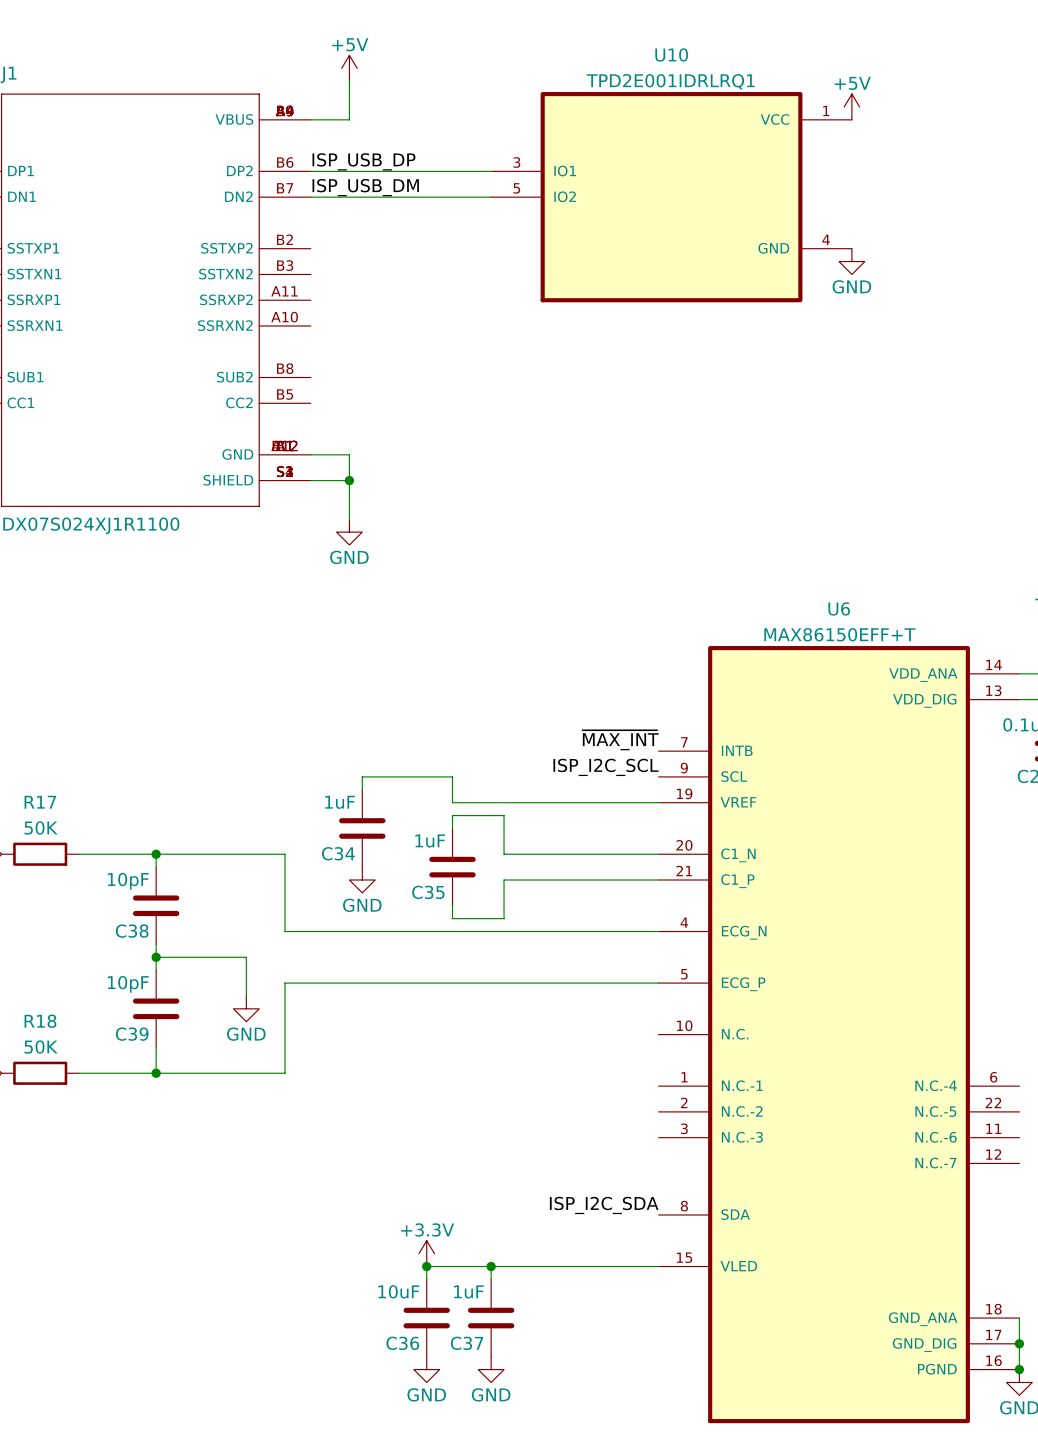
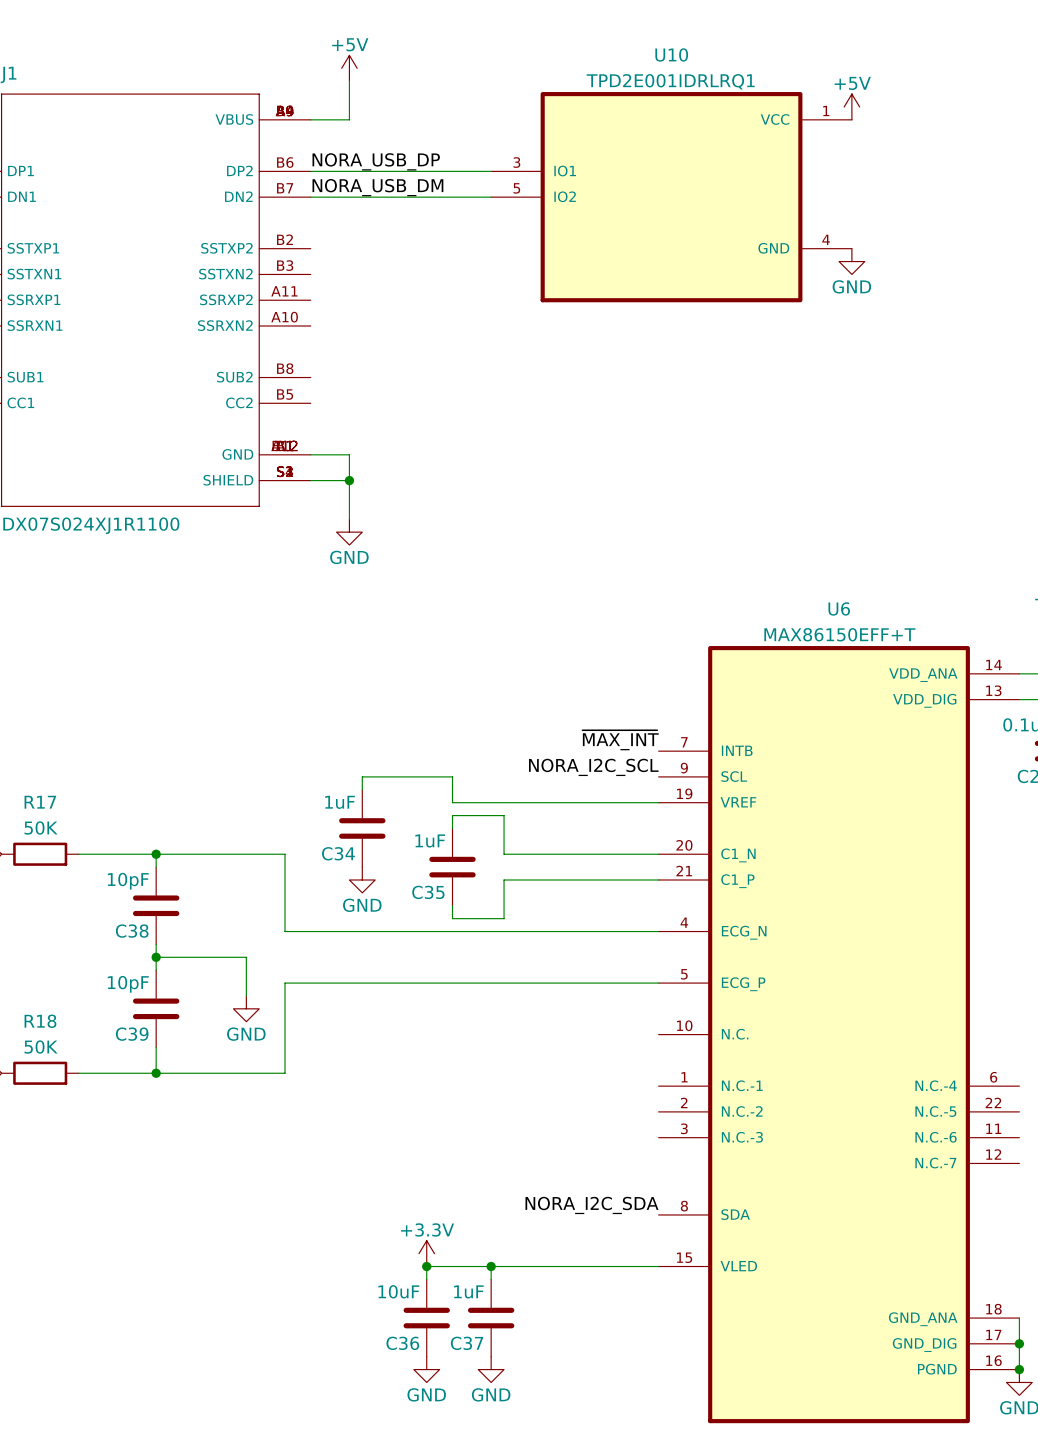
label: ISP_USB_DP (363, 161) -> NORA_USB_DP (376, 161)
label: ISP_USB_DM (365, 187) -> NORA_USB_DM (377, 187)
label: ISP_I2C_SCL (605, 767) -> NORA_I2C_SCL (593, 767)
label: ISP_I2C_SDA (604, 1205) -> NORA_I2C_SDA (591, 1205)

